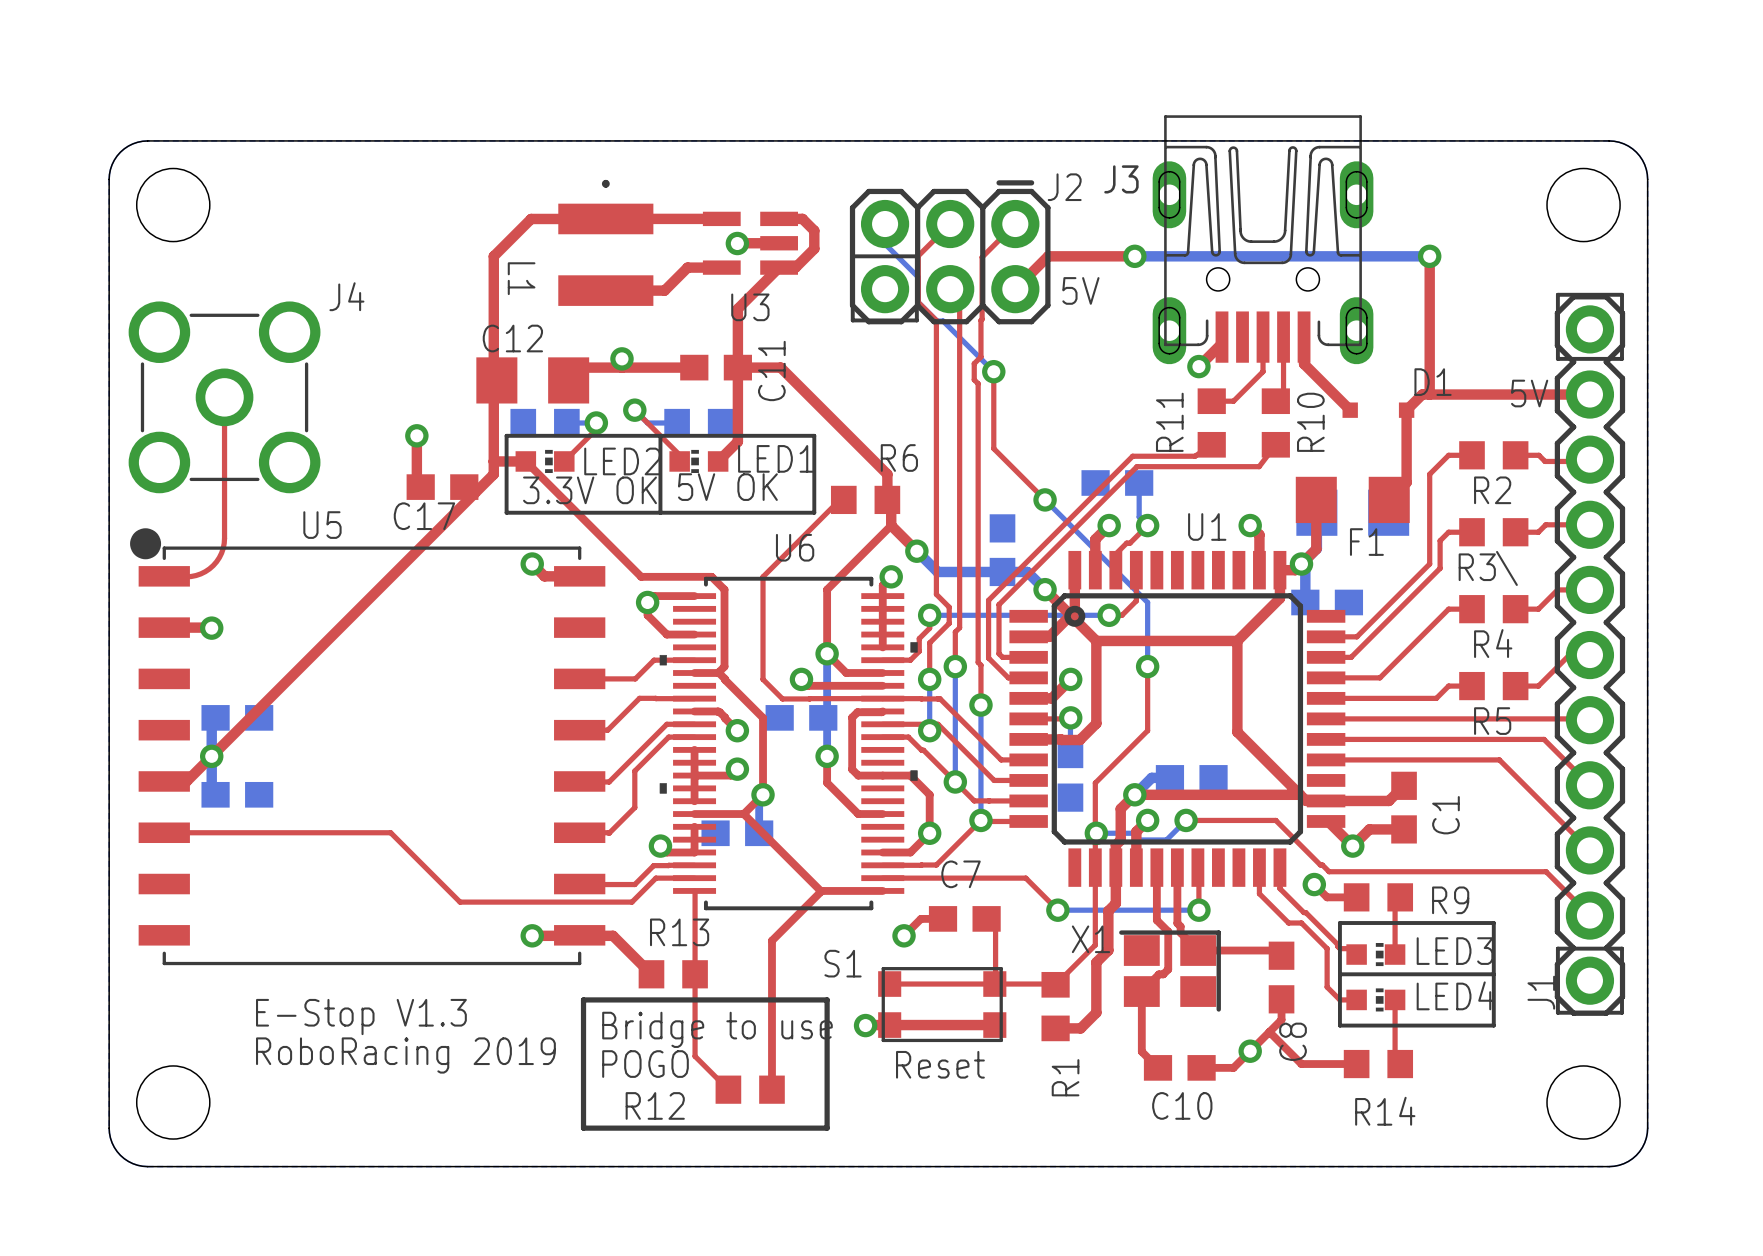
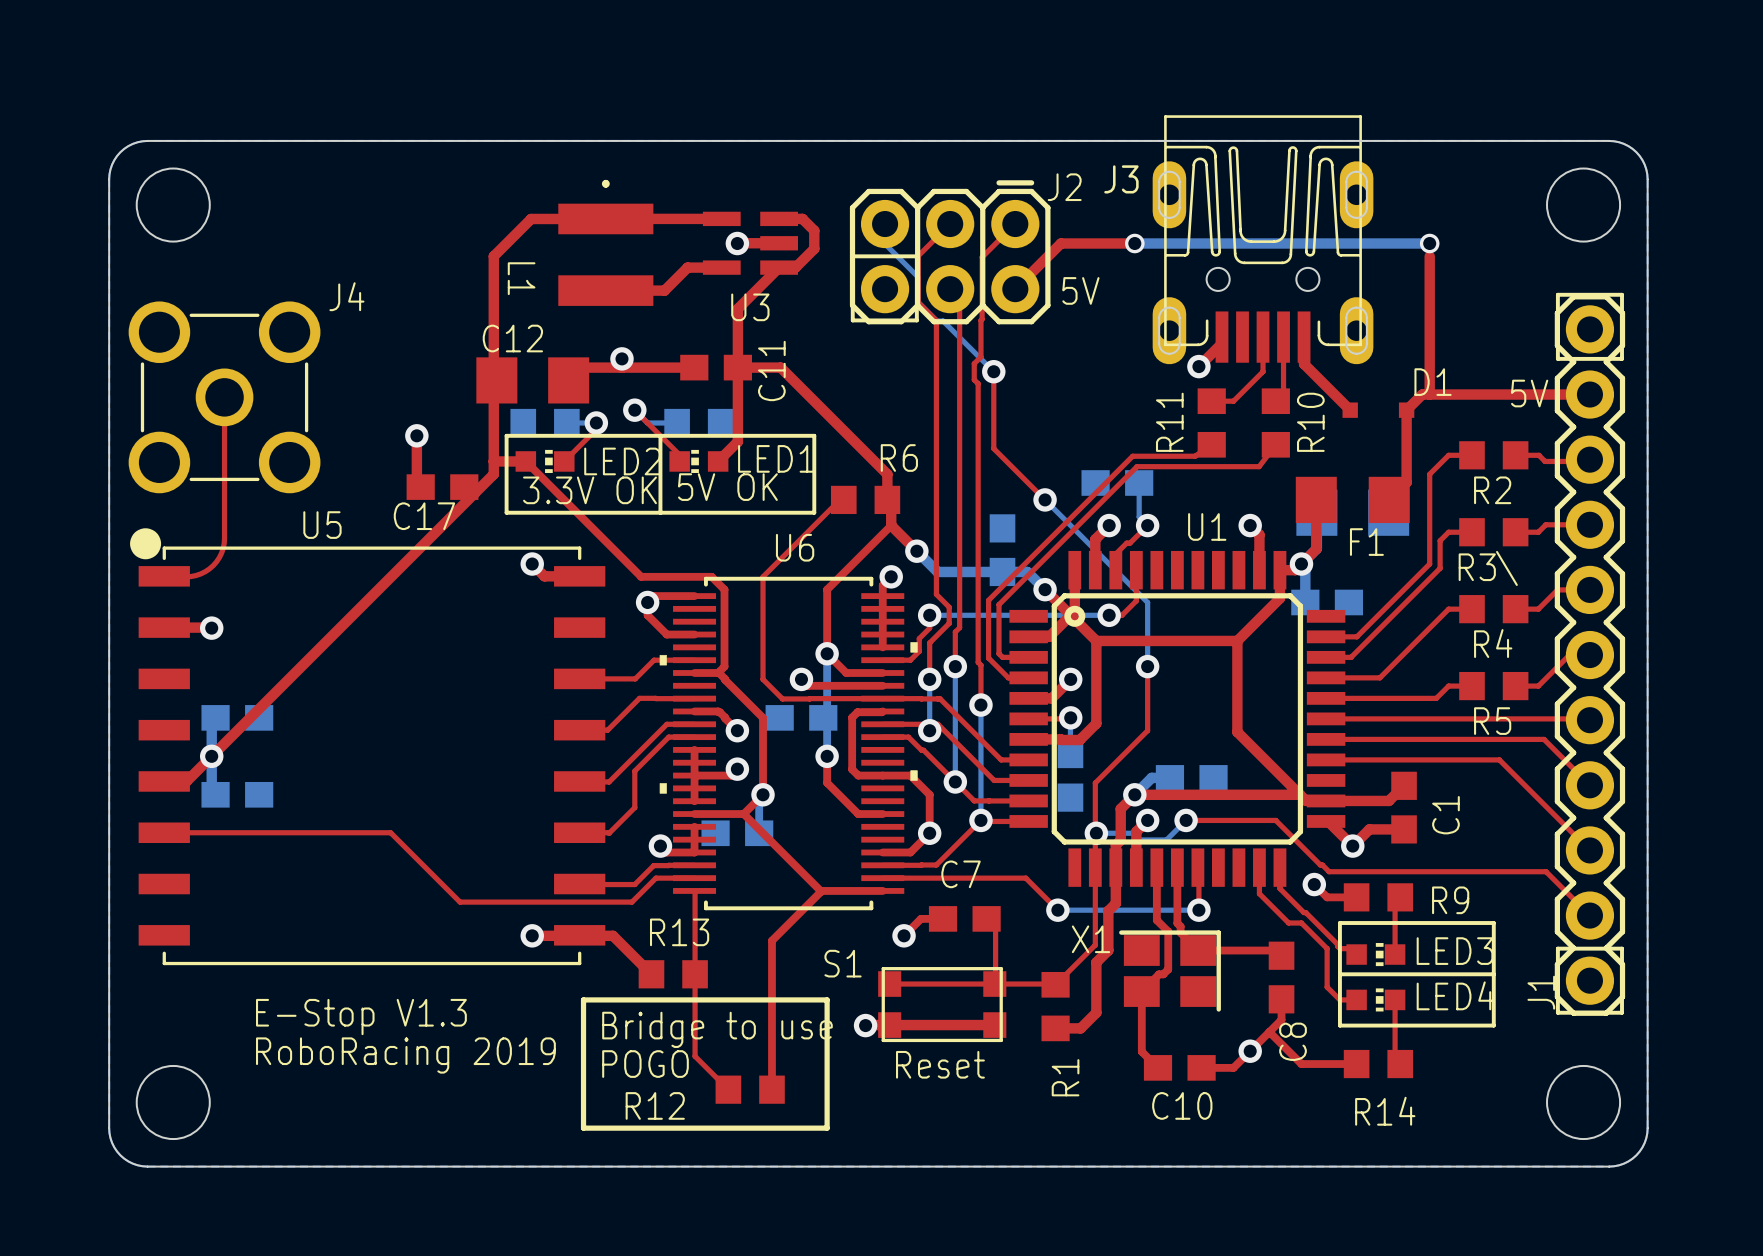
top track: (1048, 256) (1134, 256) -> (1048, 256) (1060, 243) (1134, 243)
bottom track: (1134, 256) (1429, 256) -> (1134, 243) (1429, 243)
via position: (1134, 256) -> (1134, 243)
via position: (1429, 256) -> (1429, 243)

